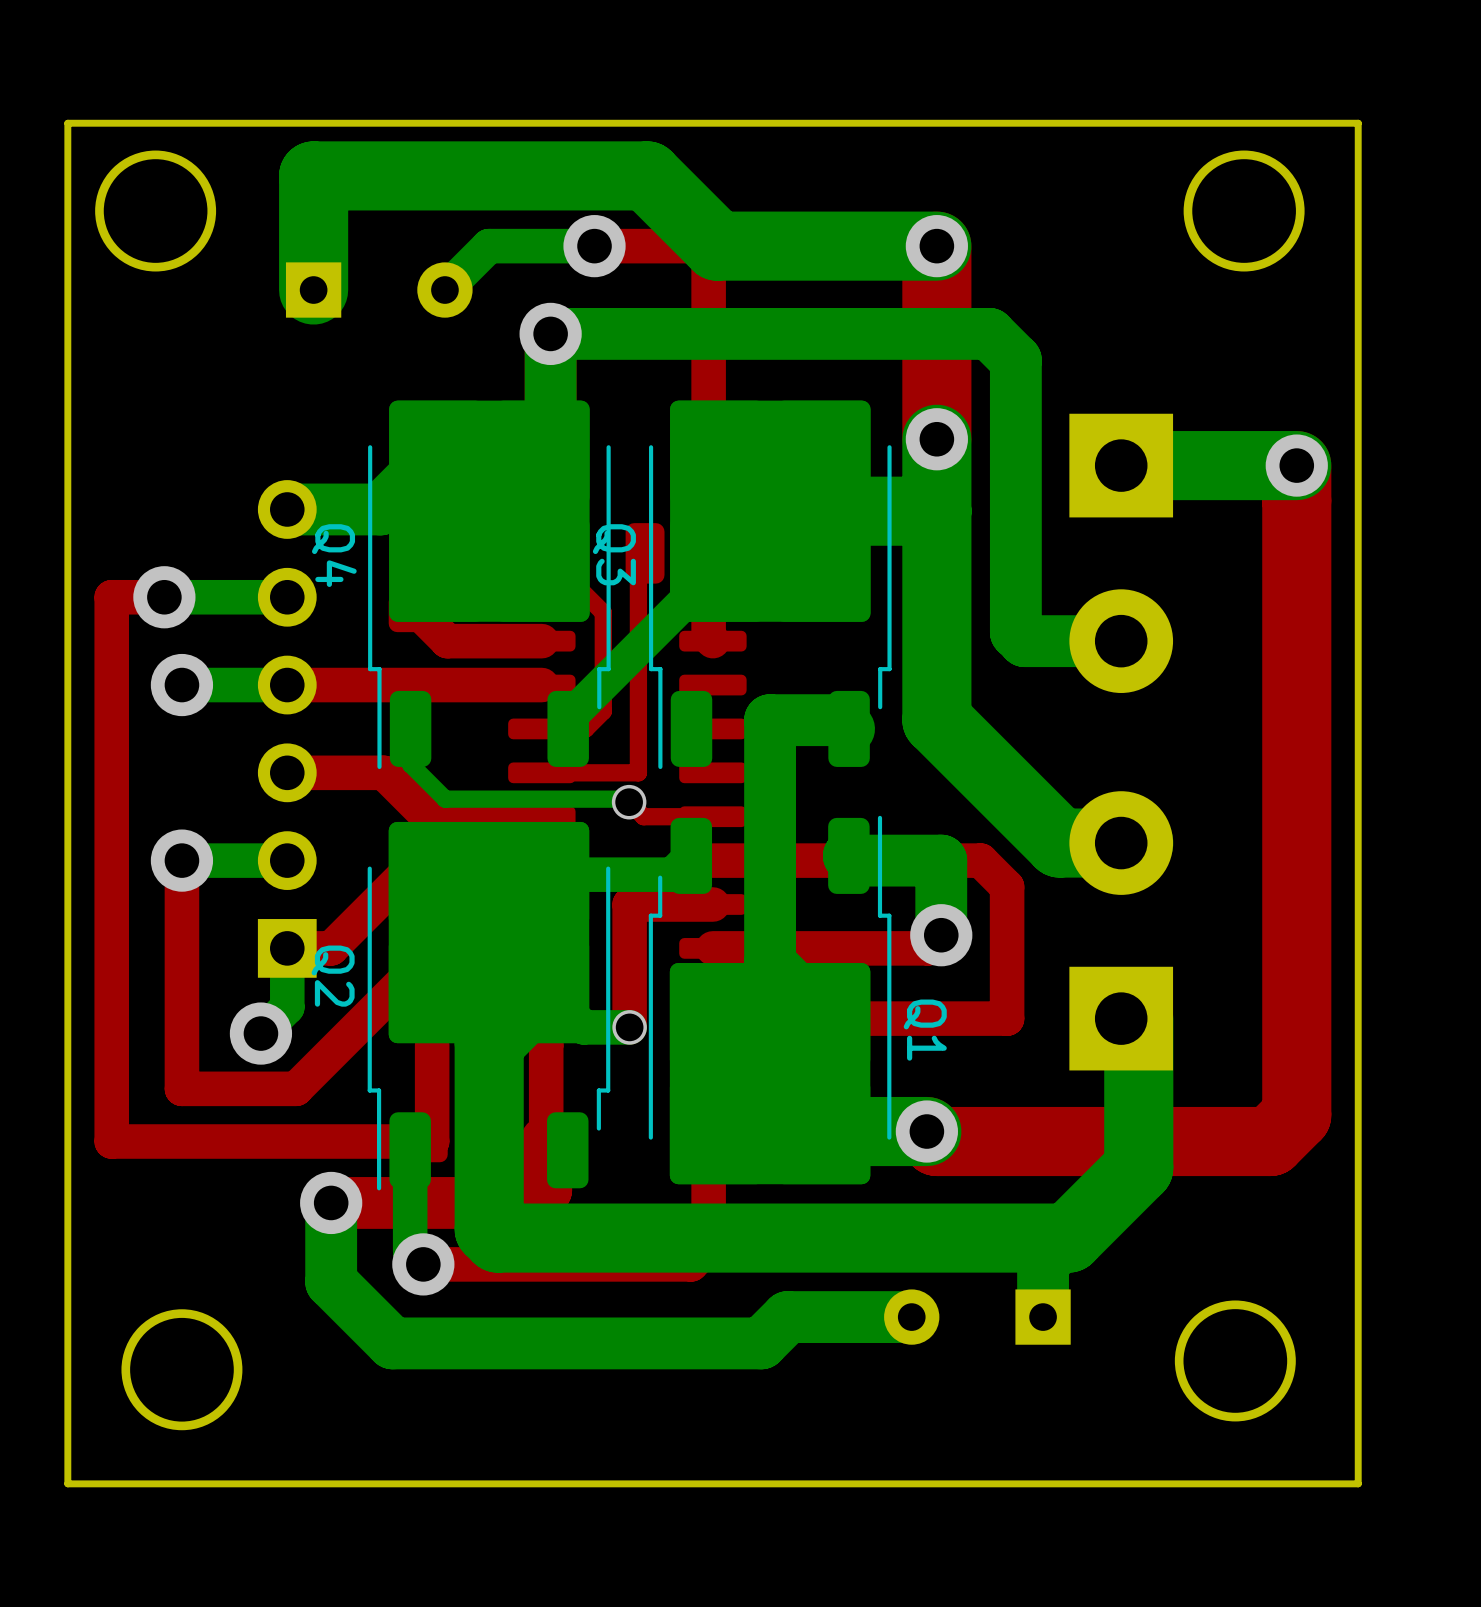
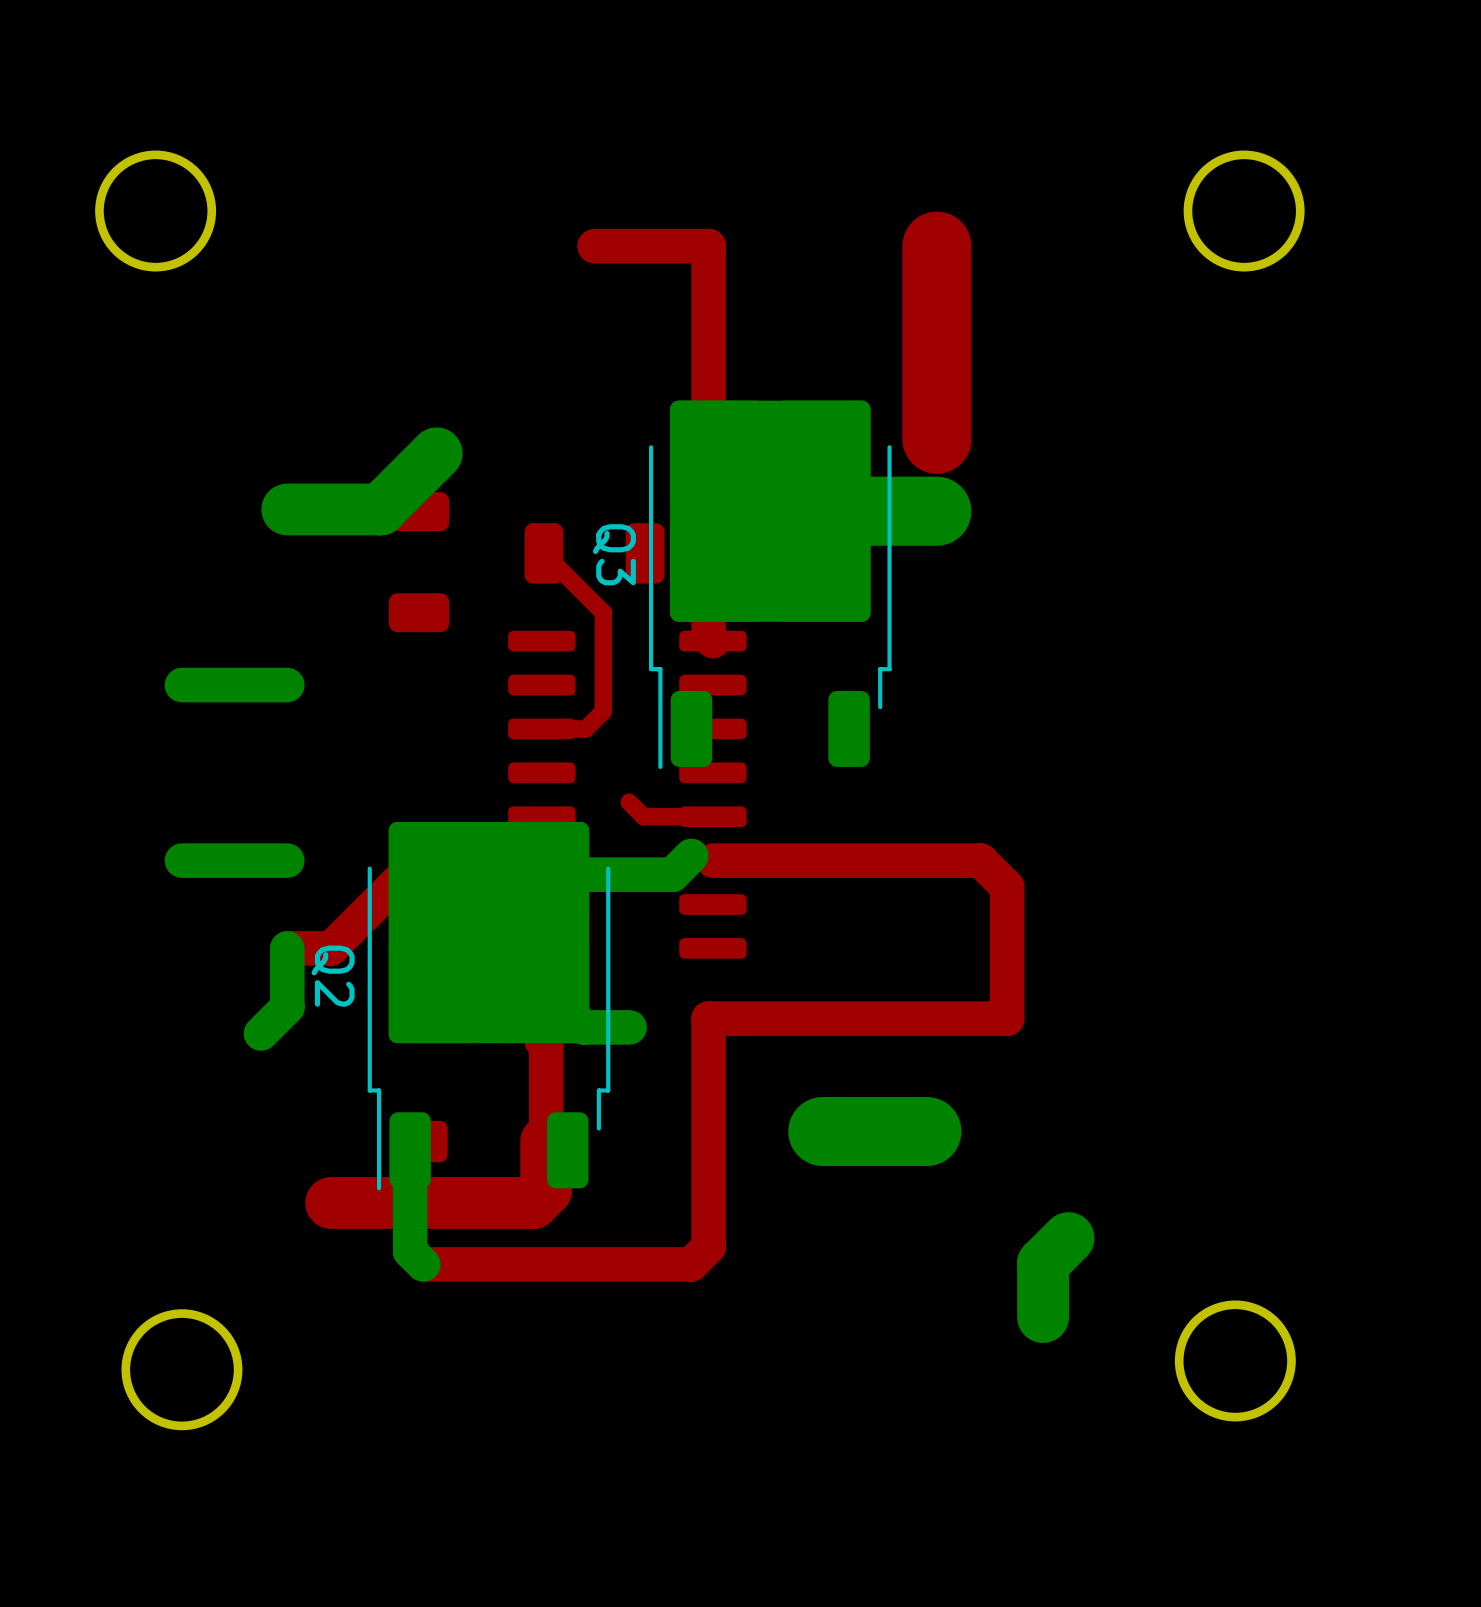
board edge: (1358, 123) (67, 123) (67, 1483) (1358, 1483) (1358, 123) -> none
bottom track: (594, 246) (488, 246) (444, 290) -> none
via: (594, 246) -> none
bottom track: (936, 246) (717, 246) (647, 175) (313, 175) (313, 290) -> none
via: (936, 246) -> none
part: (379, 290) -> none
via: (550, 333) -> none
bottom track: (936, 439) (936, 720) (1059, 843) (1138, 843) -> none
via: (936, 439) -> none
bottom track: (542, 453) (550, 444) (550, 333) (989, 333) (1015, 360) (1015, 632) (1024, 641) (1121, 641) -> none
top track: (1296, 465) (1296, 1115) (1270, 1141) (936, 1141) (926, 1131) -> none
bottom track: (1296, 465) (1121, 465) -> none
via: (1296, 465) -> none
top track: (645, 553) (638, 560) (638, 772) (541, 772) -> none
part: (1121, 553) -> none
bottom track: (717, 569) (568, 718) (568, 728) -> none
Q4: (489, 584) -> none
top track: (164, 597) (111, 597) (111, 1141) (432, 1141) (432, 1044) -> none
via: (164, 597) -> none
bottom track: (287, 597) (164, 597) -> none
top track: (418, 612) (447, 641) (541, 641) -> none
via: (181, 685) -> none
top track: (541, 685) (287, 685) -> none
part: (287, 728) -> none
bottom track: (410, 728) (410, 764) (445, 799) (626, 799) (629, 802) -> none
bottom track: (849, 728) (840, 720) (770, 720) (770, 963) (822, 1015) -> none
top track: (287, 772) (383, 772) (427, 816) (541, 816) -> none
via: (629, 802) -> none
bottom track: (853, 855) (848, 855) (853, 860) (941, 860) (941, 935) -> none
top track: (181, 860) (181, 1088) (296, 1088) (480, 904) (541, 904) -> none
via: (181, 860) -> none
top track: (712, 904) (629, 904) (629, 1027) -> none
part: (1121, 930) -> none
top track: (941, 935) (928, 948) (712, 948) -> none
via: (941, 935) -> none
bottom track: (436, 990) (541, 990) (489, 1042) (489, 1229) (497, 1238) (1068, 1238) (1138, 1167) (1138, 1018) -> none
Q1: (770, 1000) -> none
via: (629, 1027) -> none
via: (260, 1033) -> none
via: (926, 1131) -> none
bottom track: (331, 1202) (331, 1281) (392, 1343) (761, 1343) (787, 1317) (911, 1317) -> none
via: (331, 1202) -> none
via: (423, 1264) -> none
part: (977, 1317) -> none

